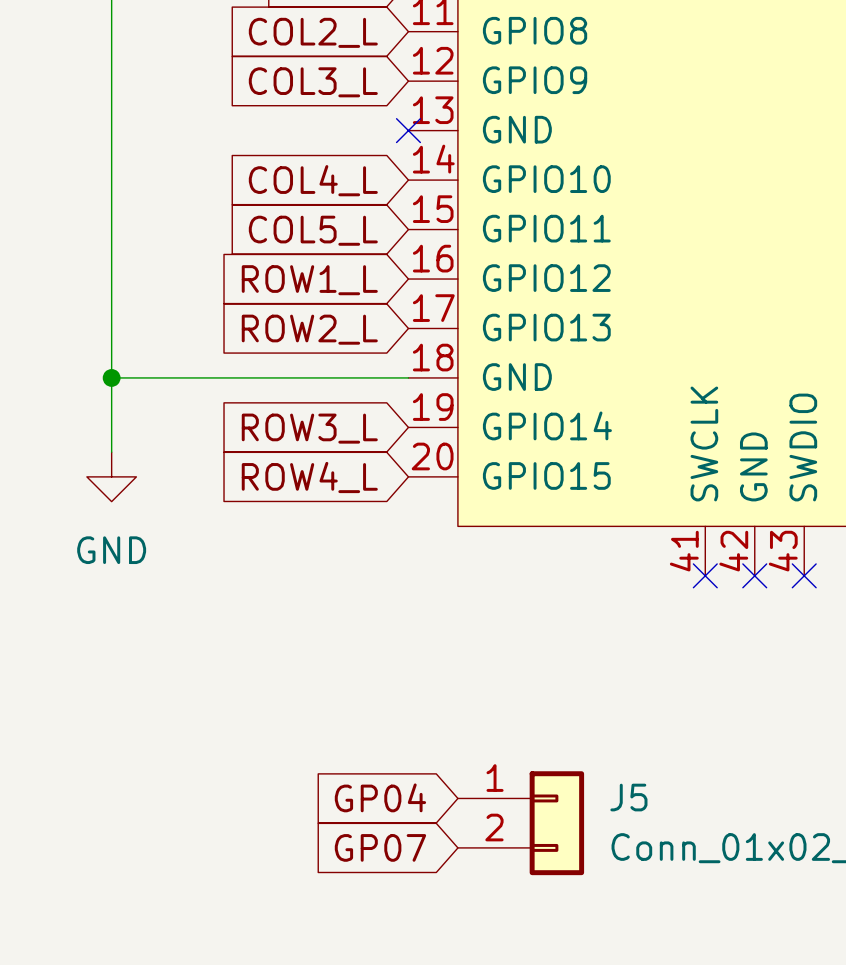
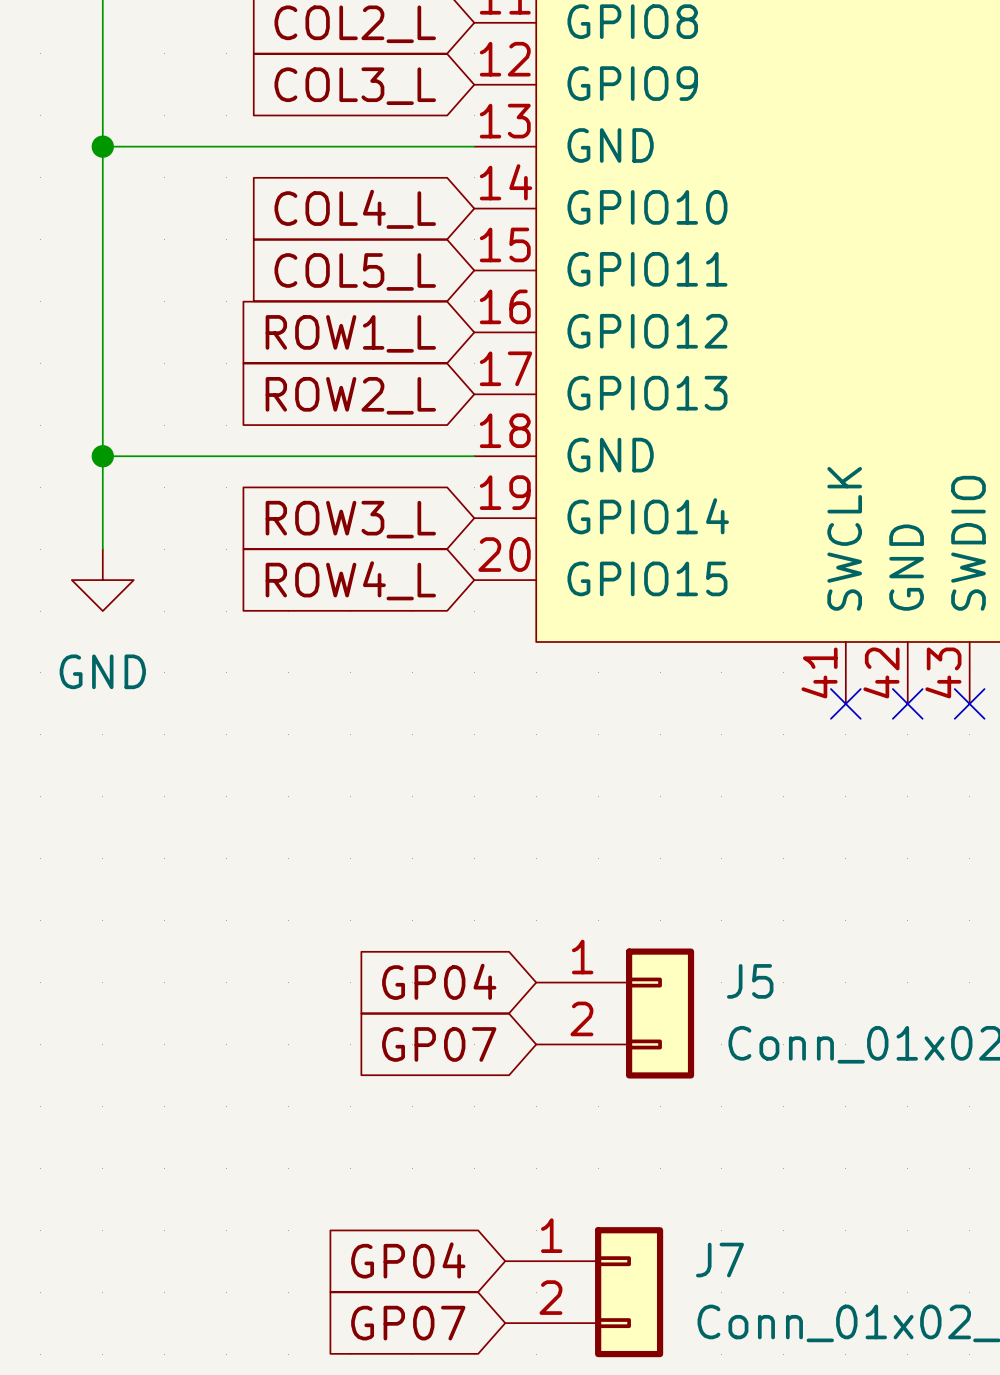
wire: none -> (102, 146) (474, 146)
junction: none -> (102, 146)
no-connect mark: (408, 130) -> none

